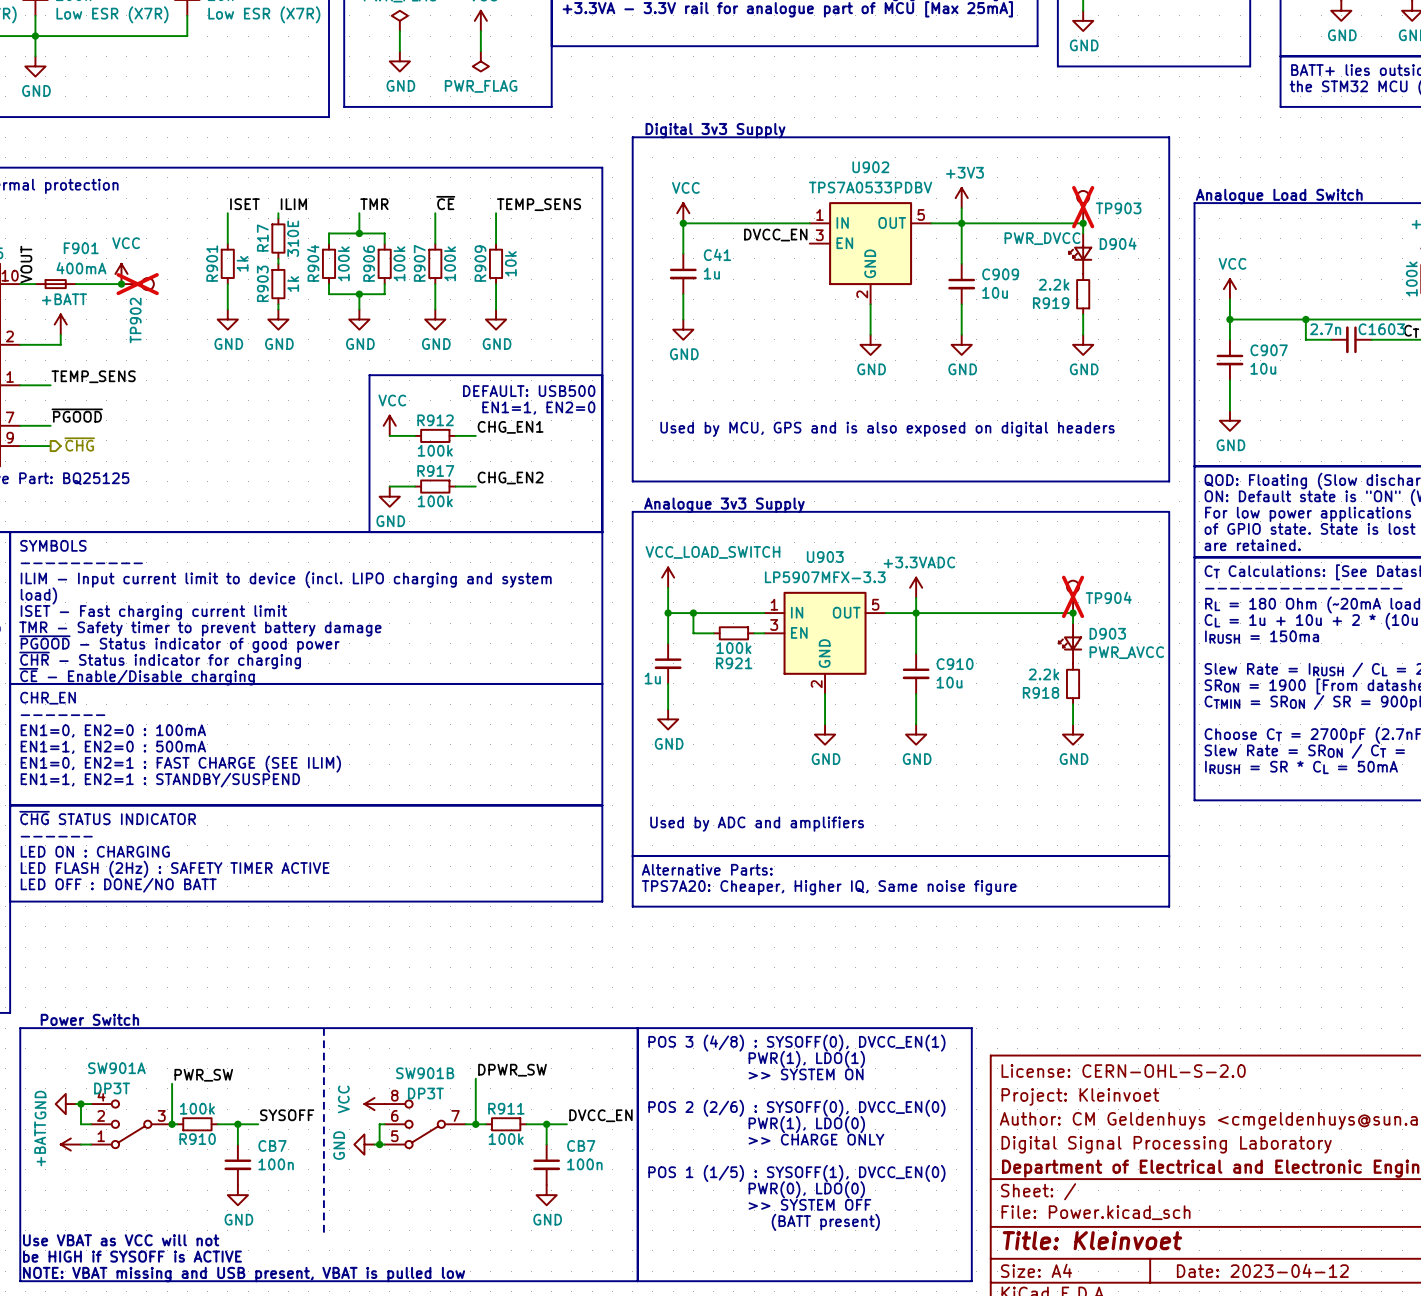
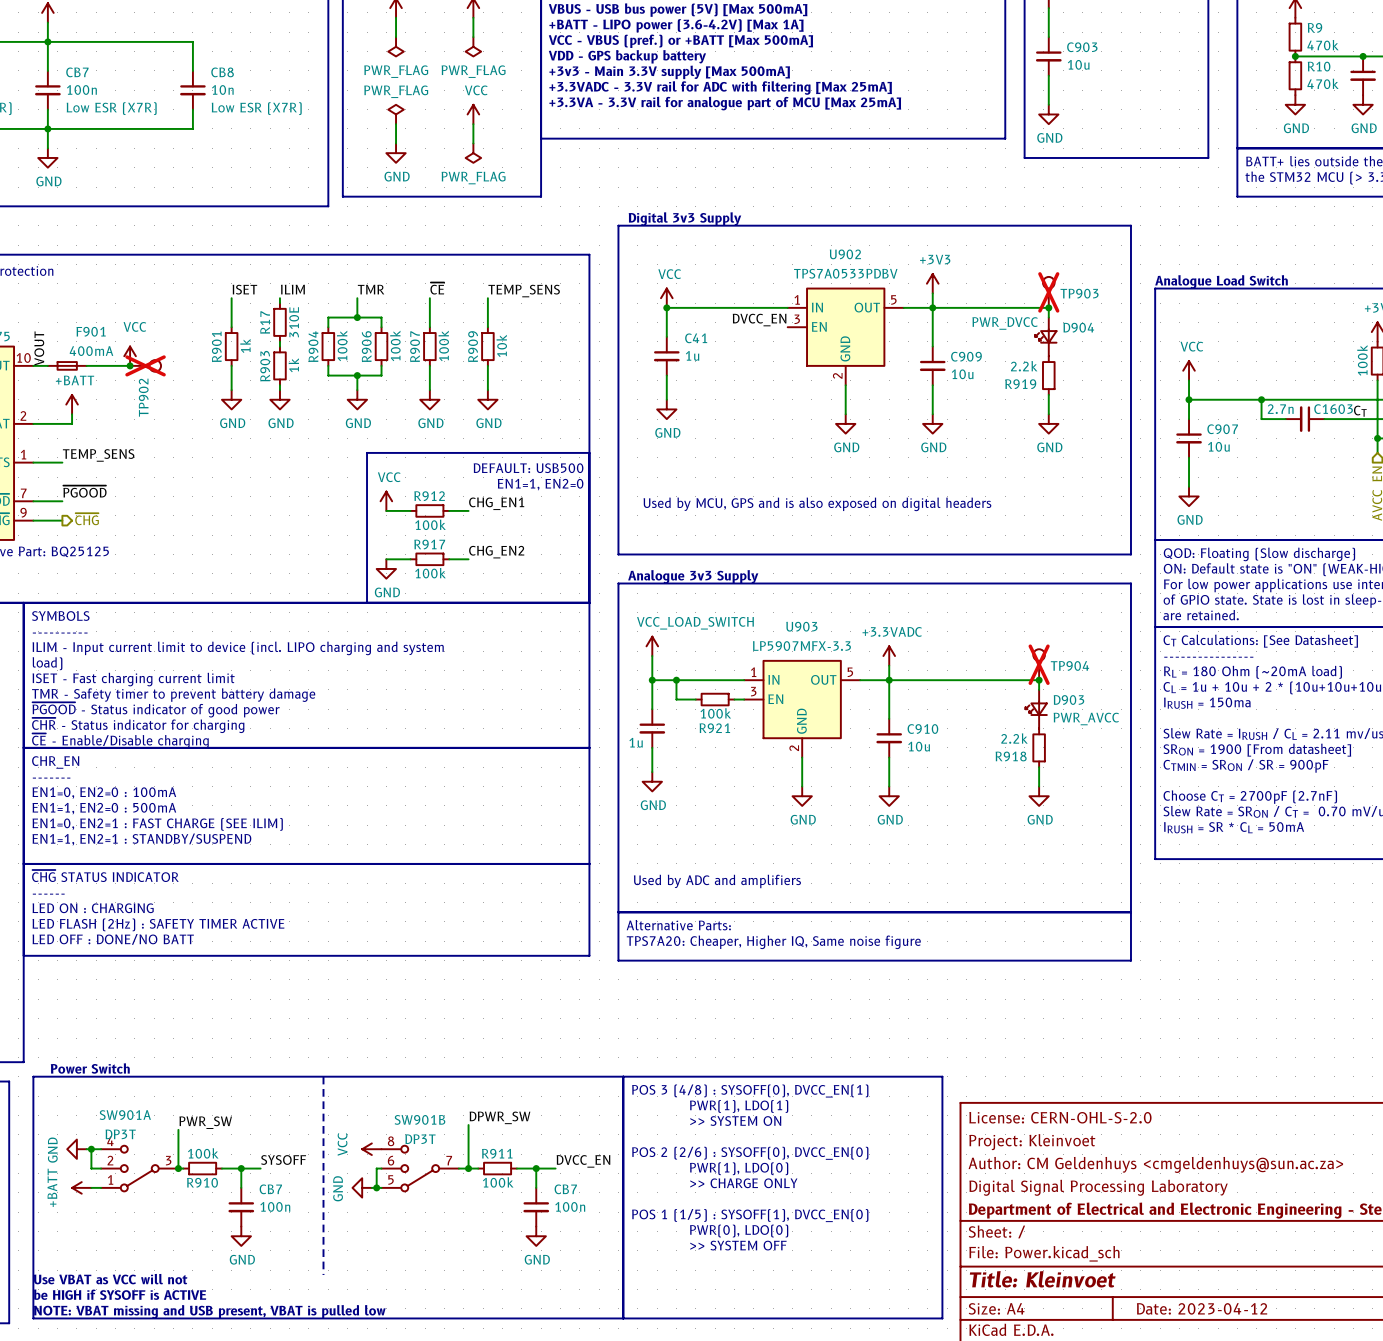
text: (BATT present) (825, 1222) -> none

